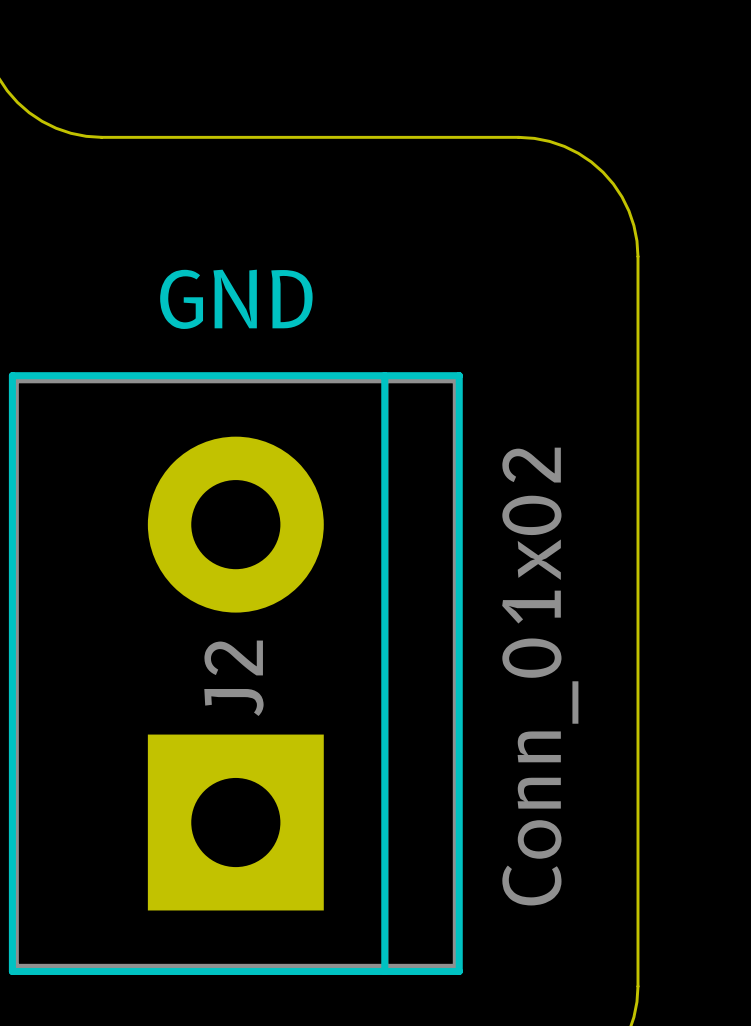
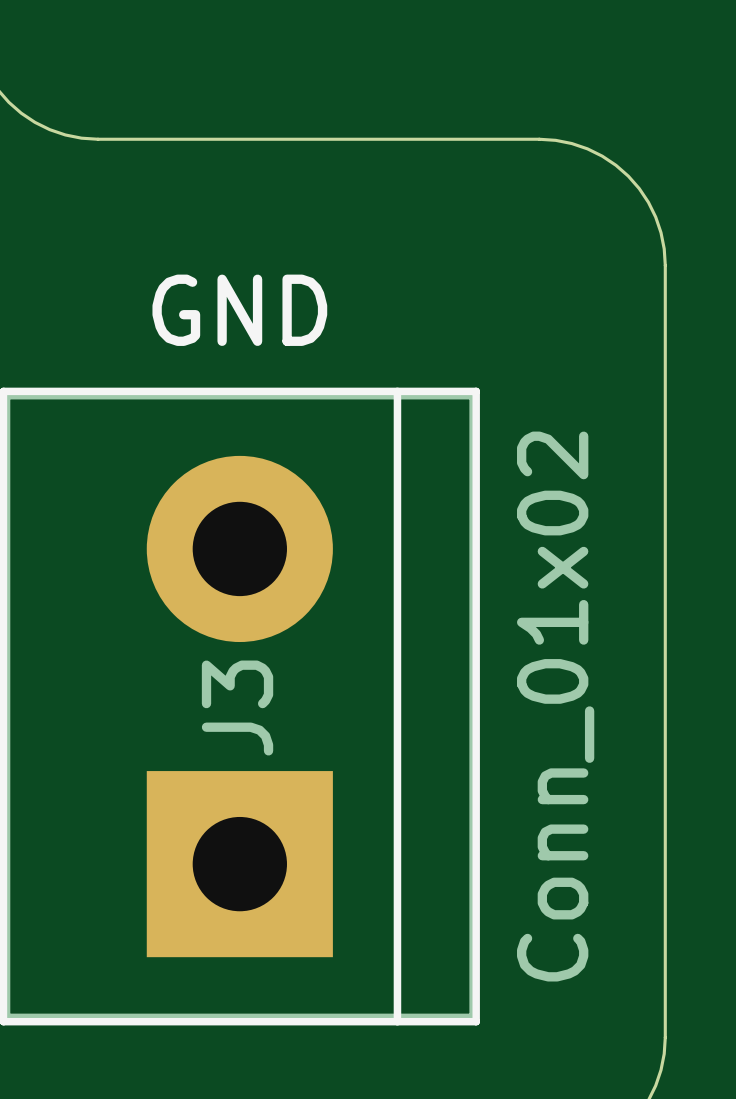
J2 name: J2 (233, 678) -> J3 (237, 708)

